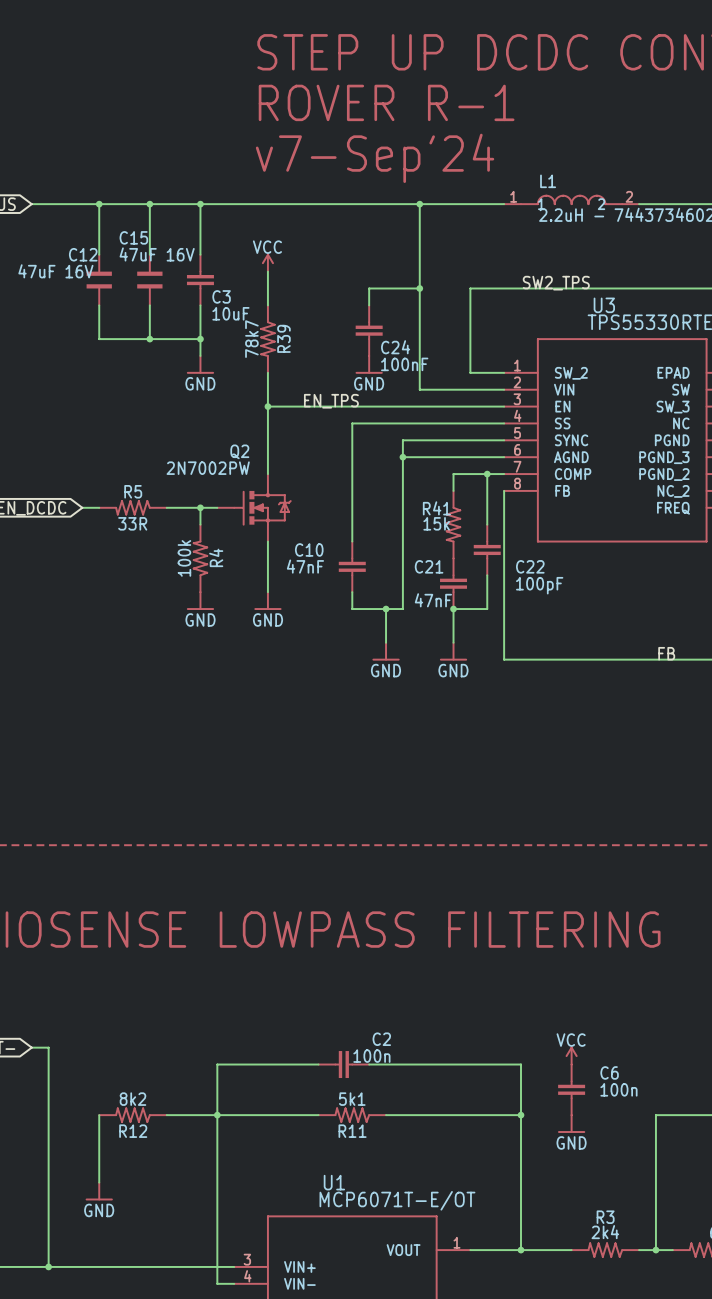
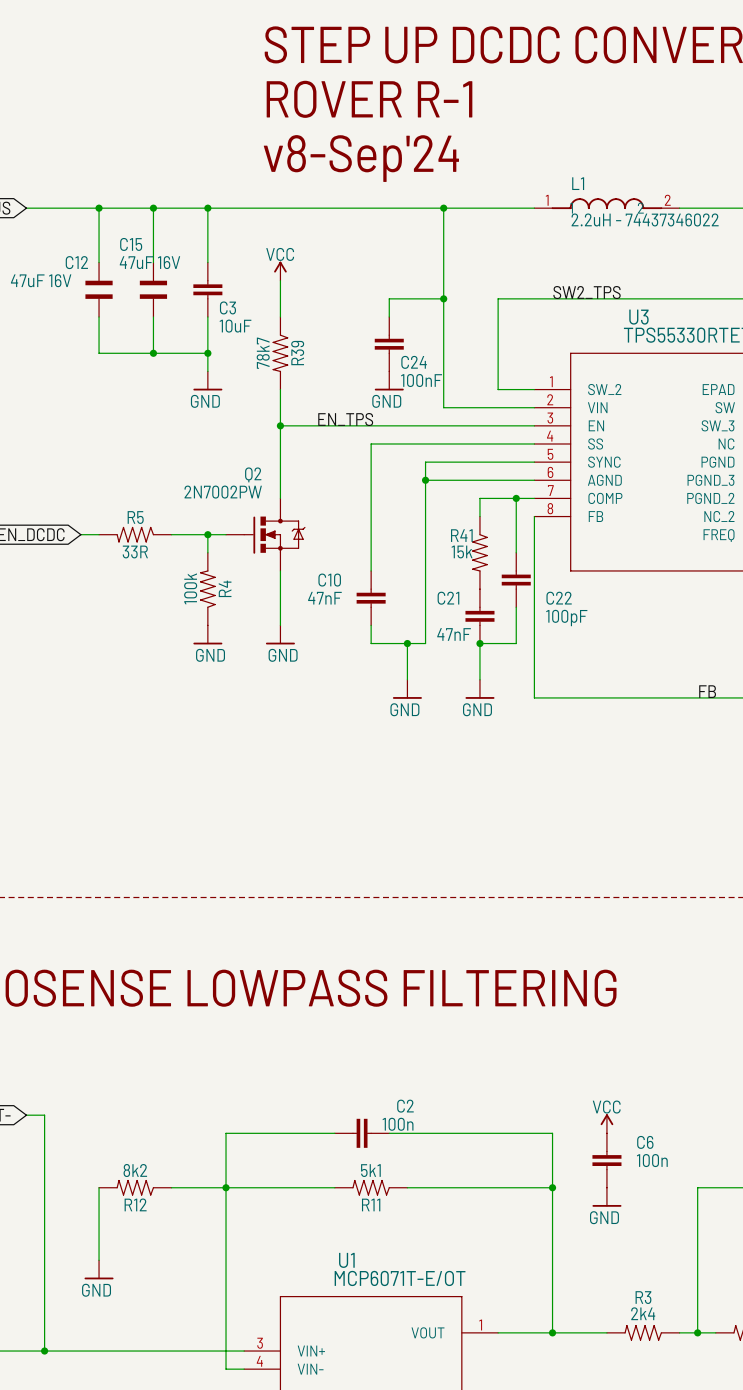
text: v7-Sep'24 (375, 158) -> v8-Sep'24 (361, 158)

